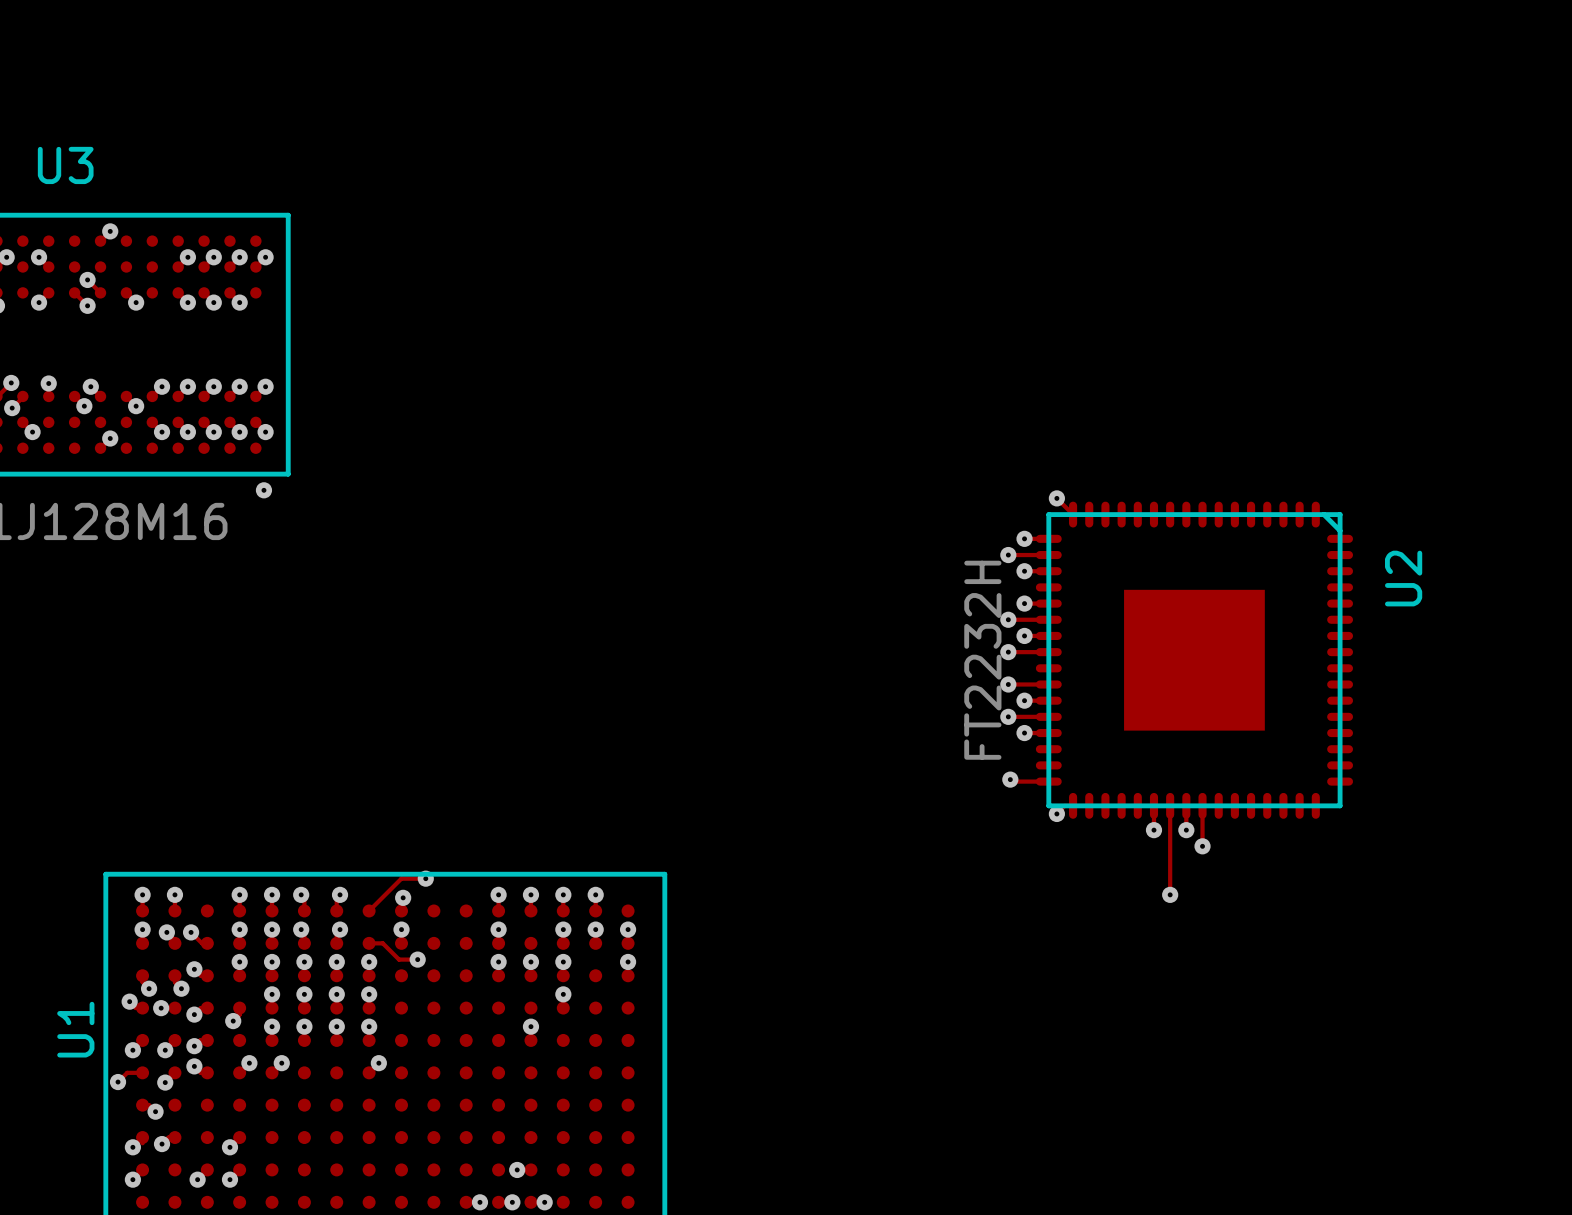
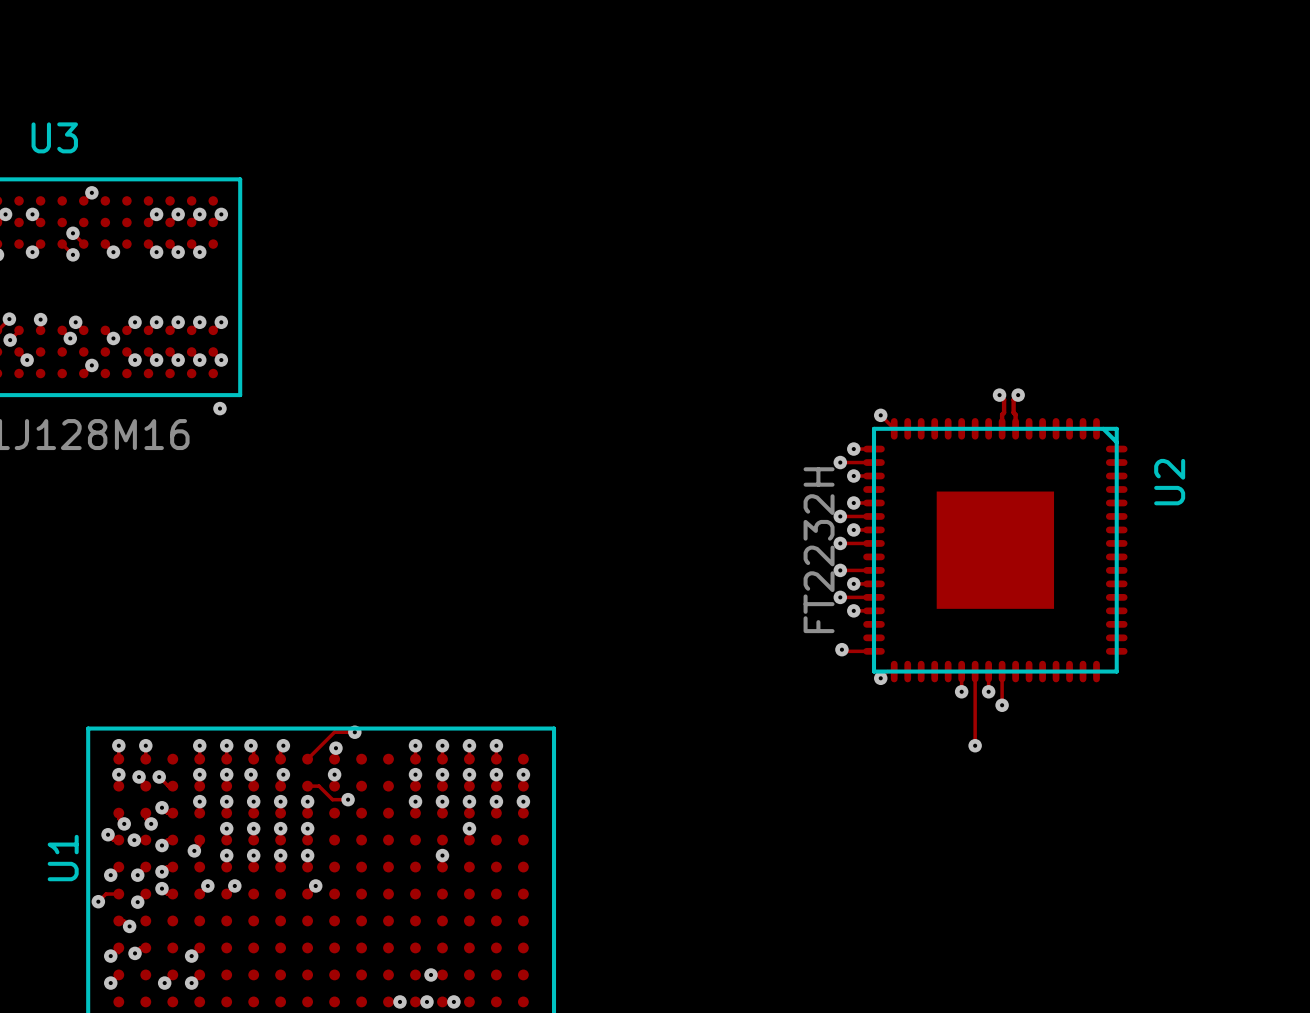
top track: none -> (999, 395) (1004, 399) (1002, 428)
via: none -> (999, 395)
top track: none -> (1018, 395) (1013, 399) (1015, 428)
via: none -> (1018, 395)
via: none -> (442, 774)
via: none -> (496, 801)

